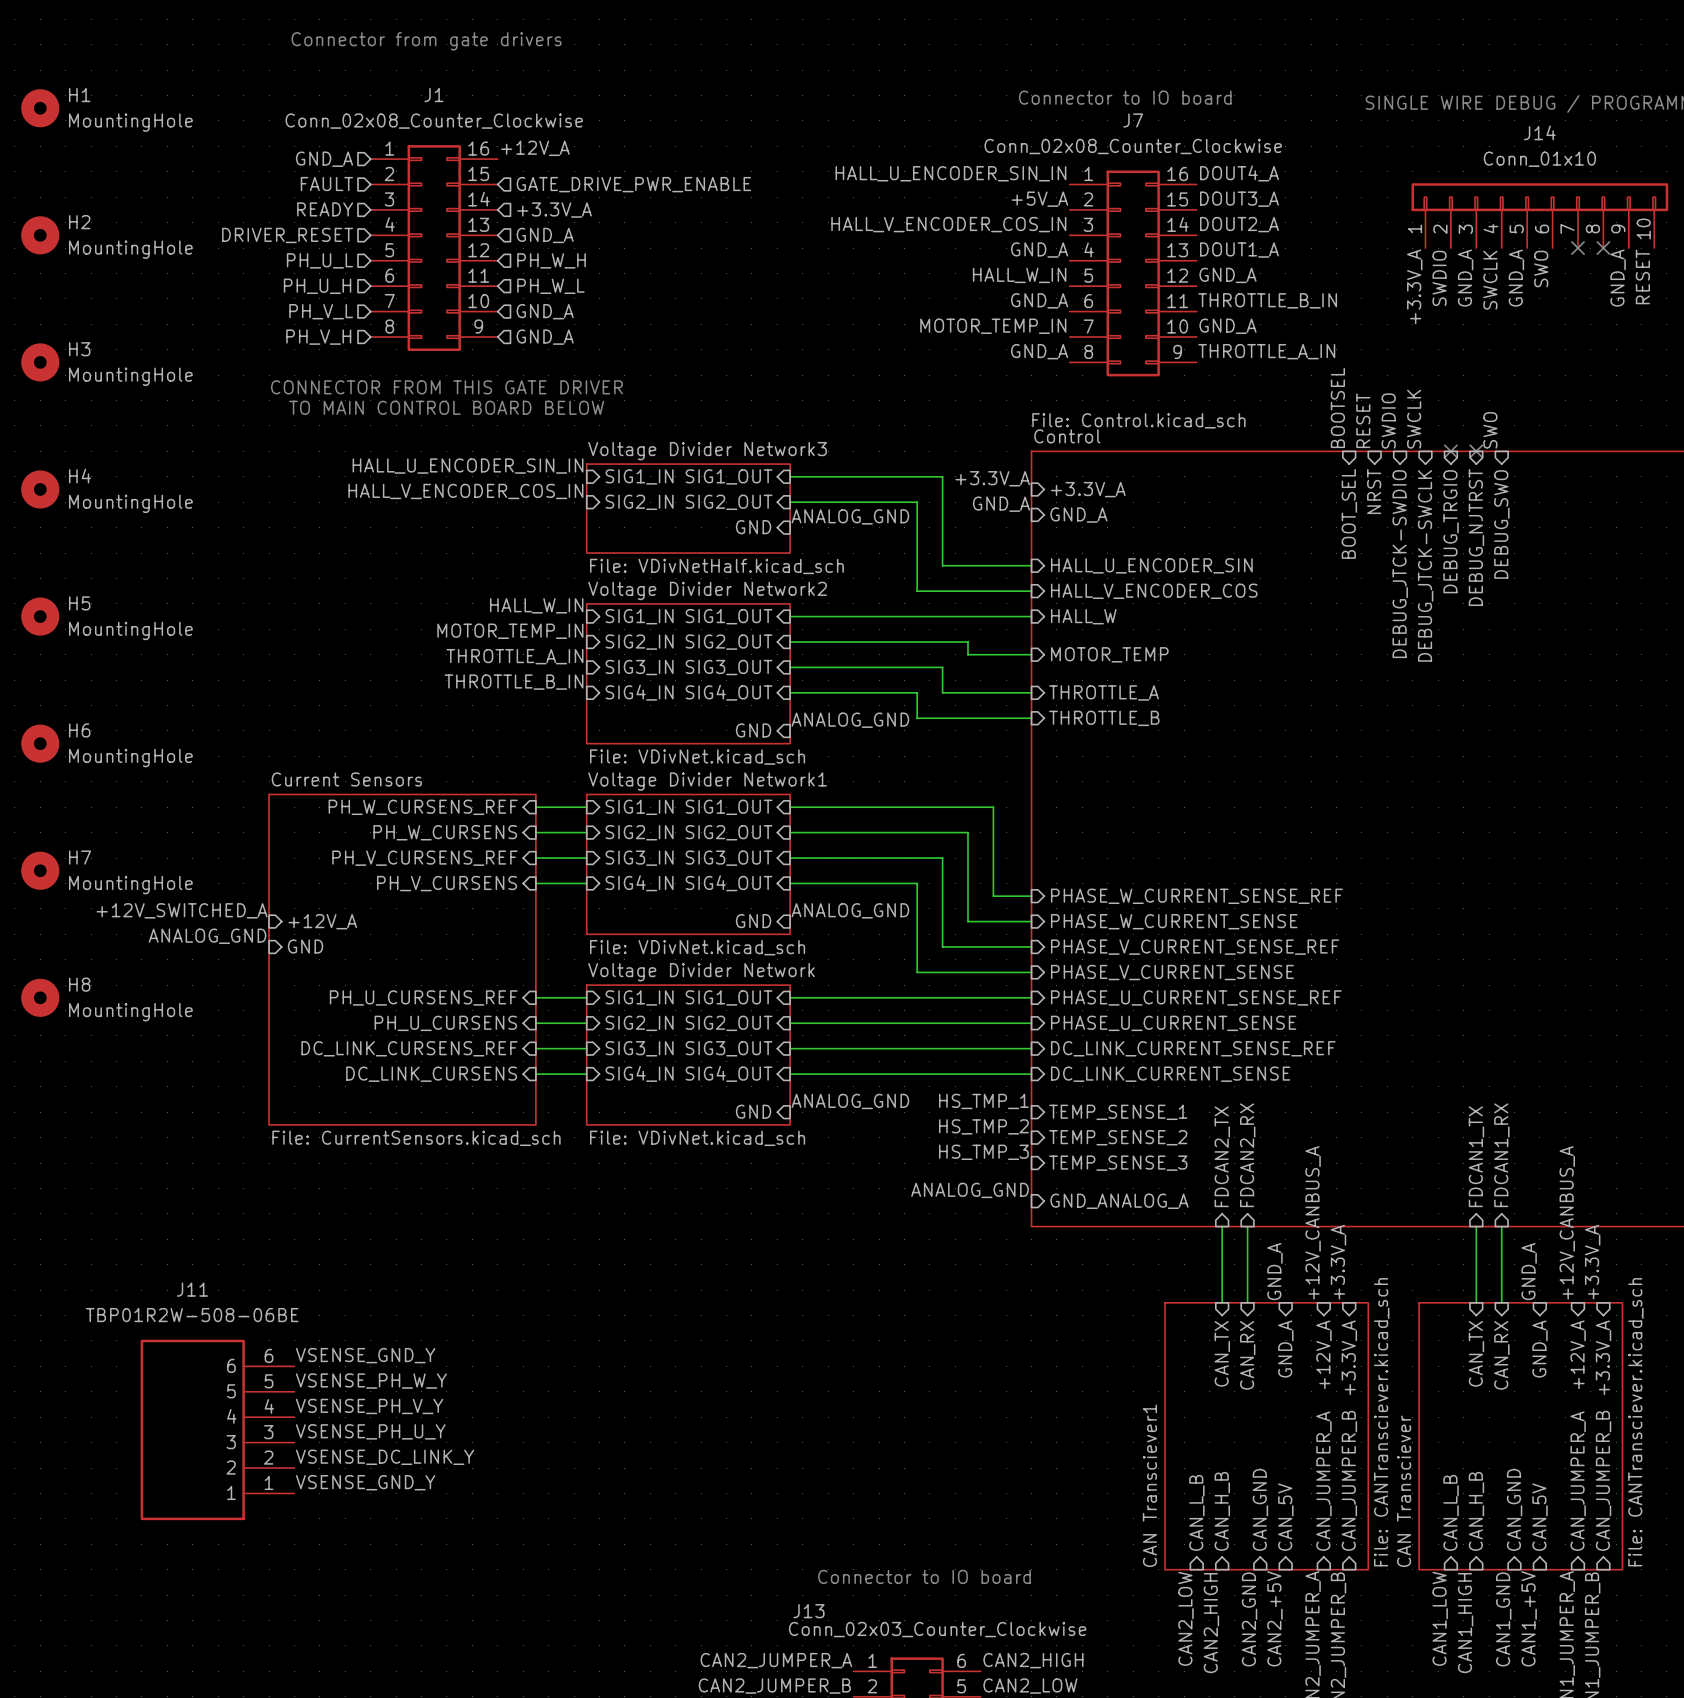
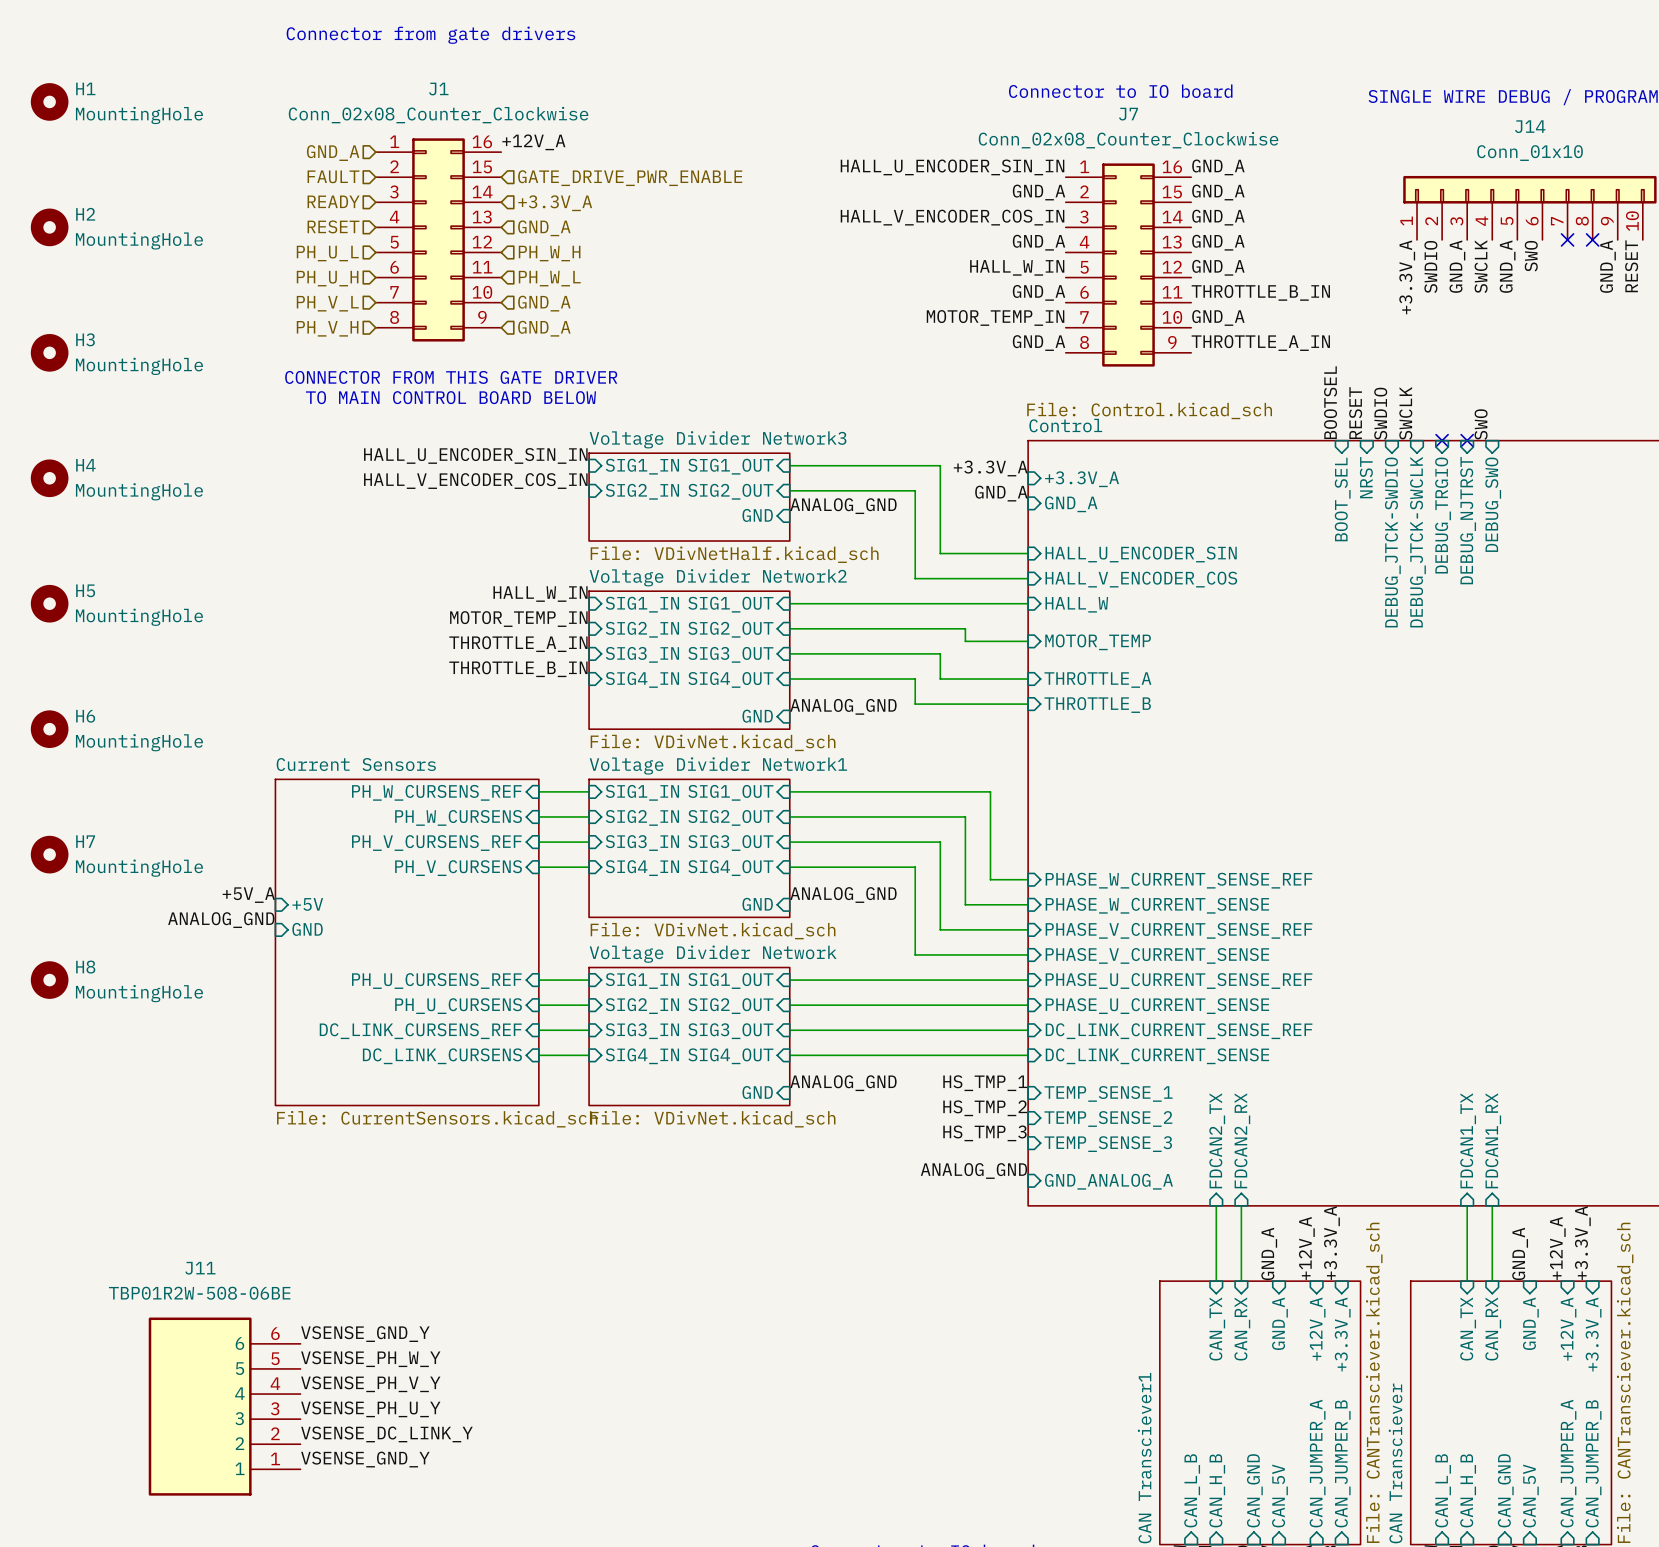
label: DOUT4_A (1239, 173) -> GND_A (1218, 167)
label: +5V_A (1039, 199) -> GND_A (1039, 192)
label: DOUT3_A (1239, 199) -> GND_A (1218, 192)
label: DOUT2_A (1239, 224) -> GND_A (1218, 217)
hierarchical label: DRIVER_RESET (287, 235) -> RESET (333, 226)
label: DOUT1_A (1239, 250) -> GND_A (1218, 242)
label: +12V_SWITCHED_A (182, 910) -> +5V_A (248, 895)
sheet pin: +12V_A (322, 921) -> +5V (307, 904)
label: +12V_CANBUS_A (1313, 1222) -> +12V_A (1306, 1248)
label: +12V_CANBUS_A (1567, 1222) -> +12V_A (1557, 1248)

